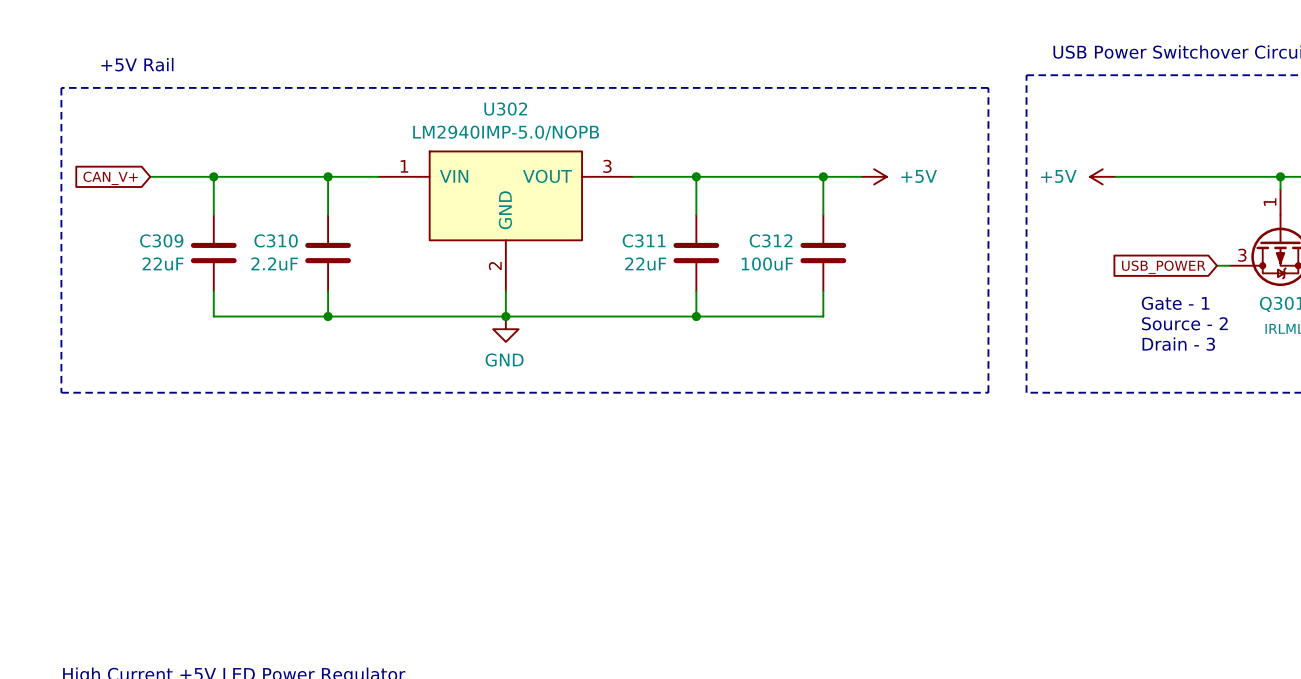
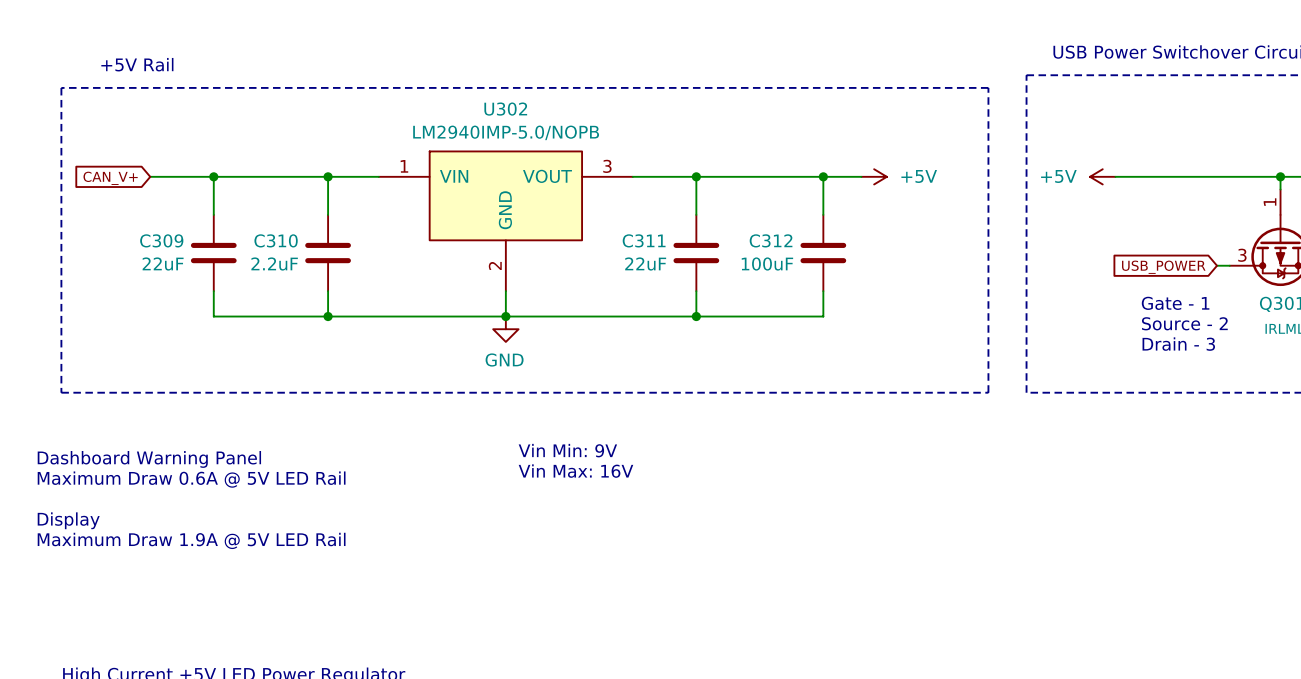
text: none -> Vin Min: 9V (567, 450)
text: none -> Dashboard Warning Panel (149, 459)
text: none -> Vin Max: 16V (575, 471)
text: none -> Maximum Draw 0.6A @ 5V LED Rail (191, 479)
text: none -> Display (68, 520)
text: none -> Maximum Draw 1.9A @ 5V LED Rail (191, 540)

